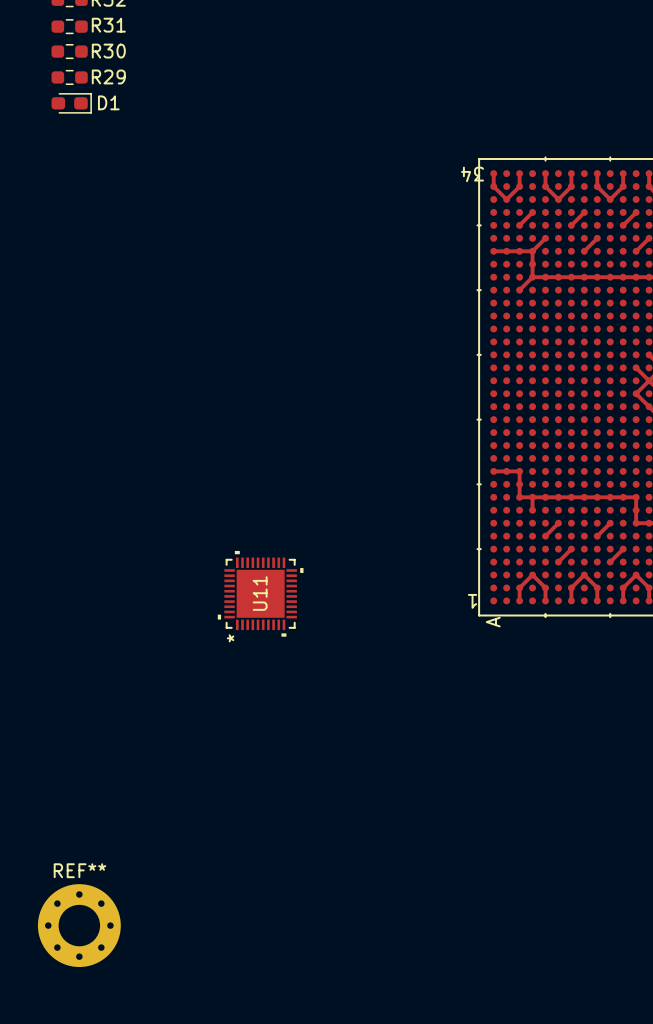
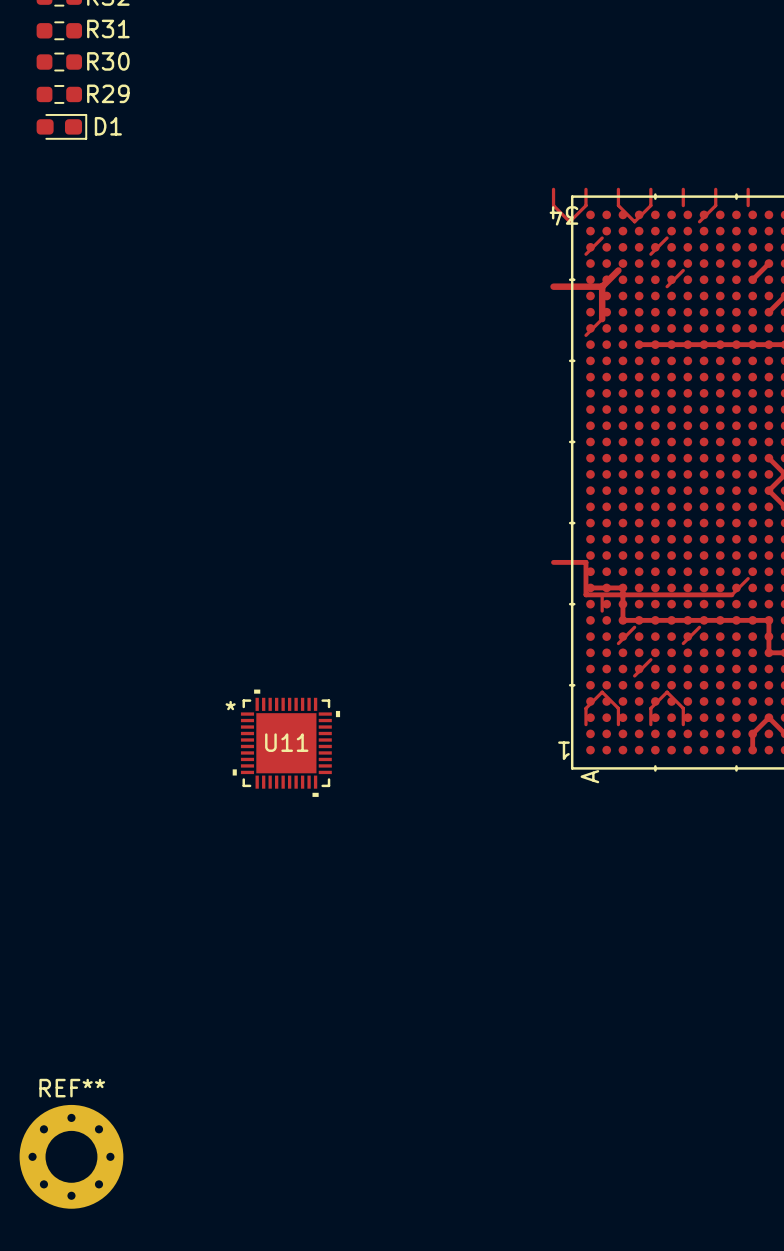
track: none -> (683, 189) (683, 205)
track: none -> (715, 189) (715, 205) (699, 221)
track: none -> (748, 189) (748, 205)
track: (493, 173) (493, 186) (506, 199) (519, 186) (519, 173) -> (553, 189) (553, 205) (569, 221) (585, 205) (585, 189)
track: (545, 173) (545, 186) (558, 199) (571, 186) (571, 173) -> (618, 189) (618, 205) (634, 221) (650, 205) (650, 189)
track: (597, 173) (597, 186) (610, 199) (623, 186) (623, 173) -> none
track: (532, 212) (519, 225) -> (602, 238) (585, 254)
track: (584, 212) (571, 225) -> (667, 238) (650, 254)
track: (545, 238) (532, 251) -> (618, 270) (602, 286)
track: (597, 238) (584, 251) -> (683, 270) (667, 286)
track: (493, 251) (532, 251) -> (553, 286) (602, 286)
track: (532, 251) (532, 277) (519, 290) -> (602, 286) (602, 319) (585, 335)
track: none -> (553, 562) (585, 562) (585, 594) (731, 594) (748, 578)
track: (532, 497) (532, 510) -> (602, 594) (602, 611)
track: (558, 523) (545, 536) -> (634, 627) (618, 643)
track: (610, 523) (597, 536) -> (699, 627) (683, 643)
track: (571, 549) (558, 562) -> (650, 659) (634, 675)
track: (623, 549) (610, 562) -> none
U11 rotation: 0° (260, 593) -> 90° clockwise (286, 743)
track: (519, 600) (519, 587) (532, 575) (545, 587) (545, 600) -> (585, 724) (585, 708) (602, 692) (618, 708) (618, 724)
track: (571, 600) (571, 587) (584, 575) (597, 587) (597, 600) -> (650, 724) (650, 708) (667, 692) (683, 708) (683, 724)

